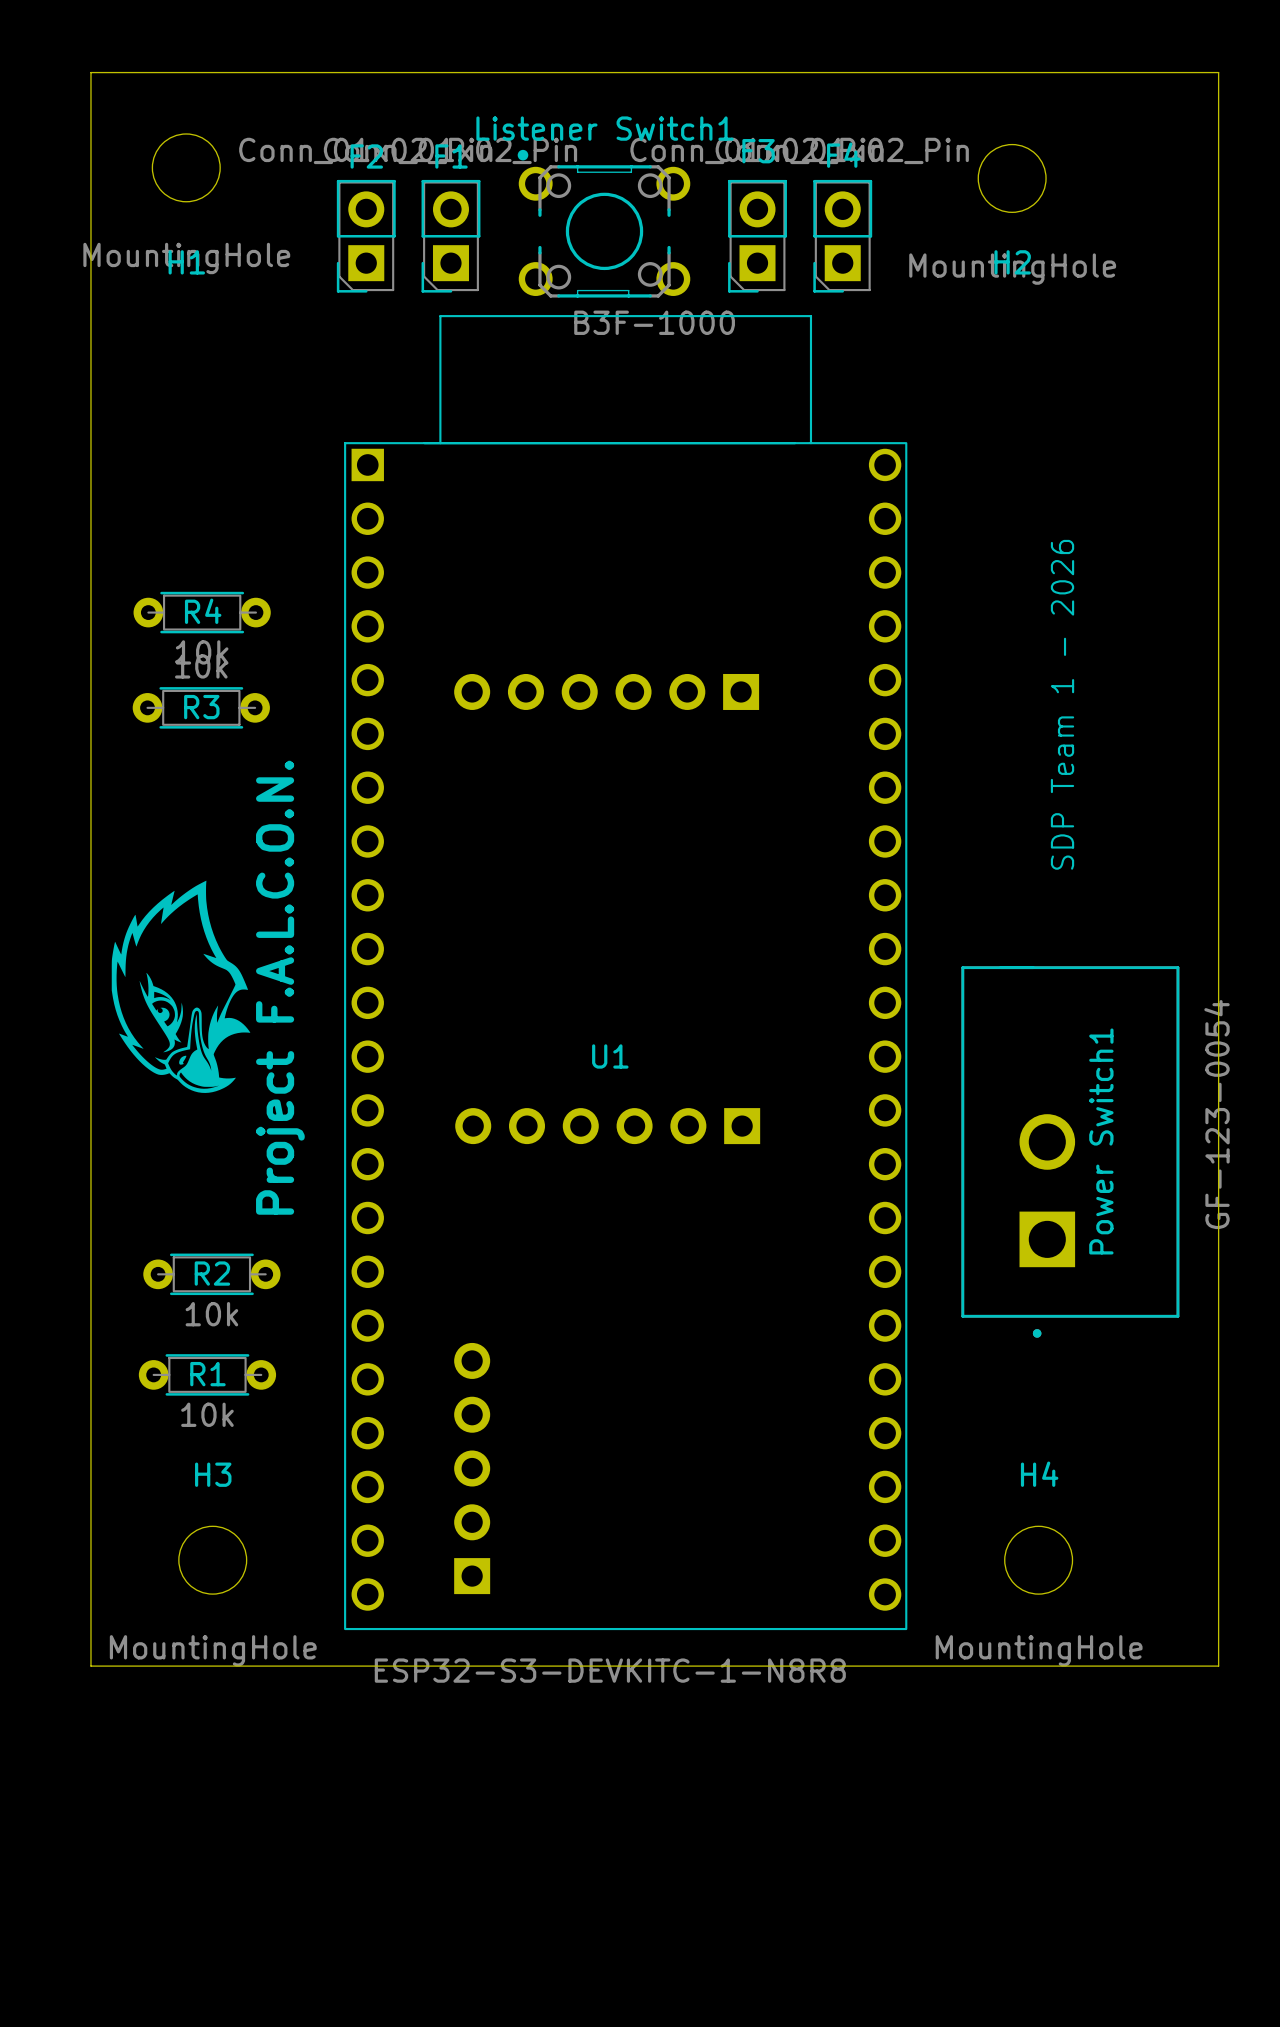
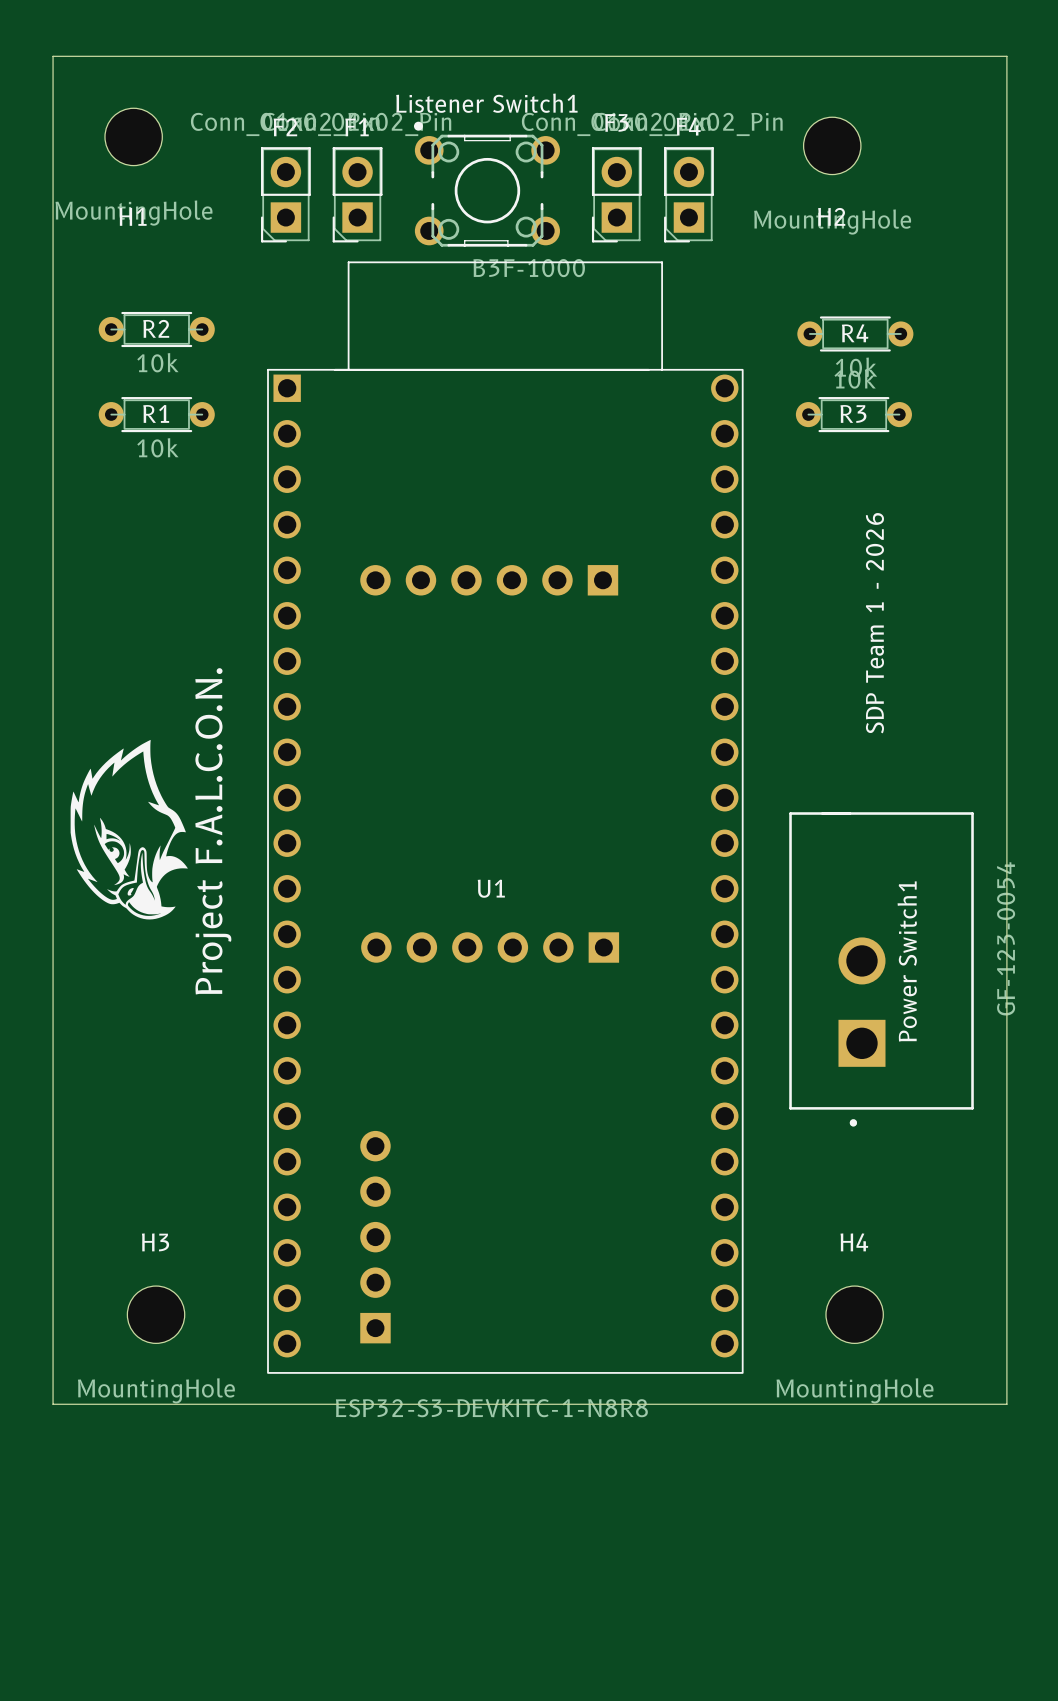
R4 position: (202, 612) -> (855, 333)
R3 position: (201, 707) -> (853, 414)
R2 position: (211, 1274) -> (156, 329)
R1 position: (207, 1374) -> (156, 414)

